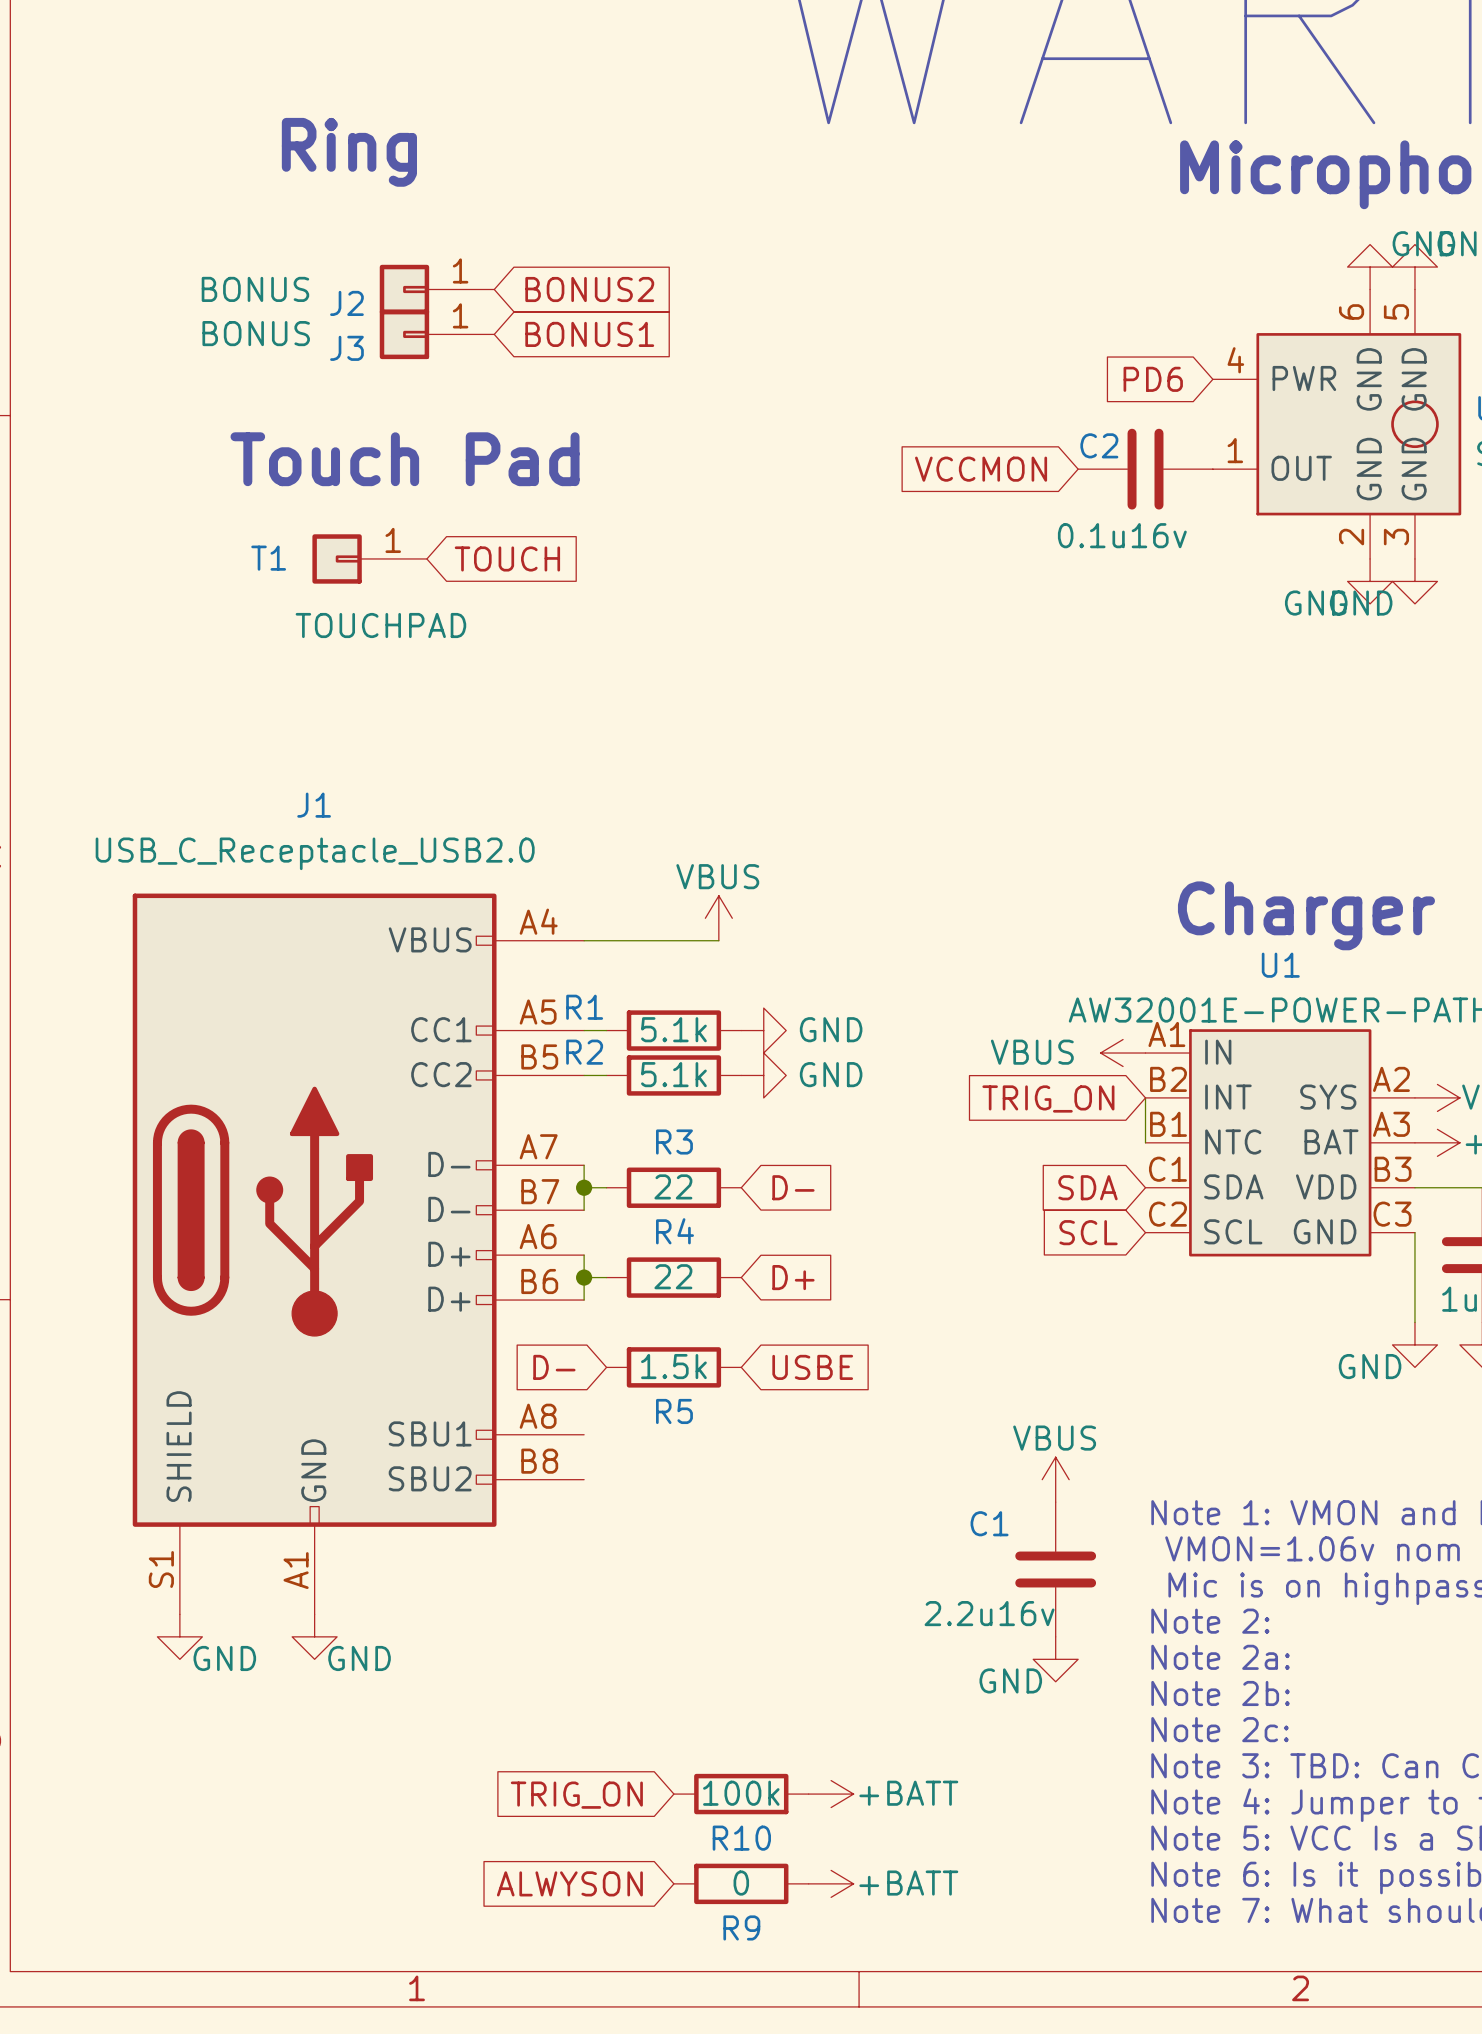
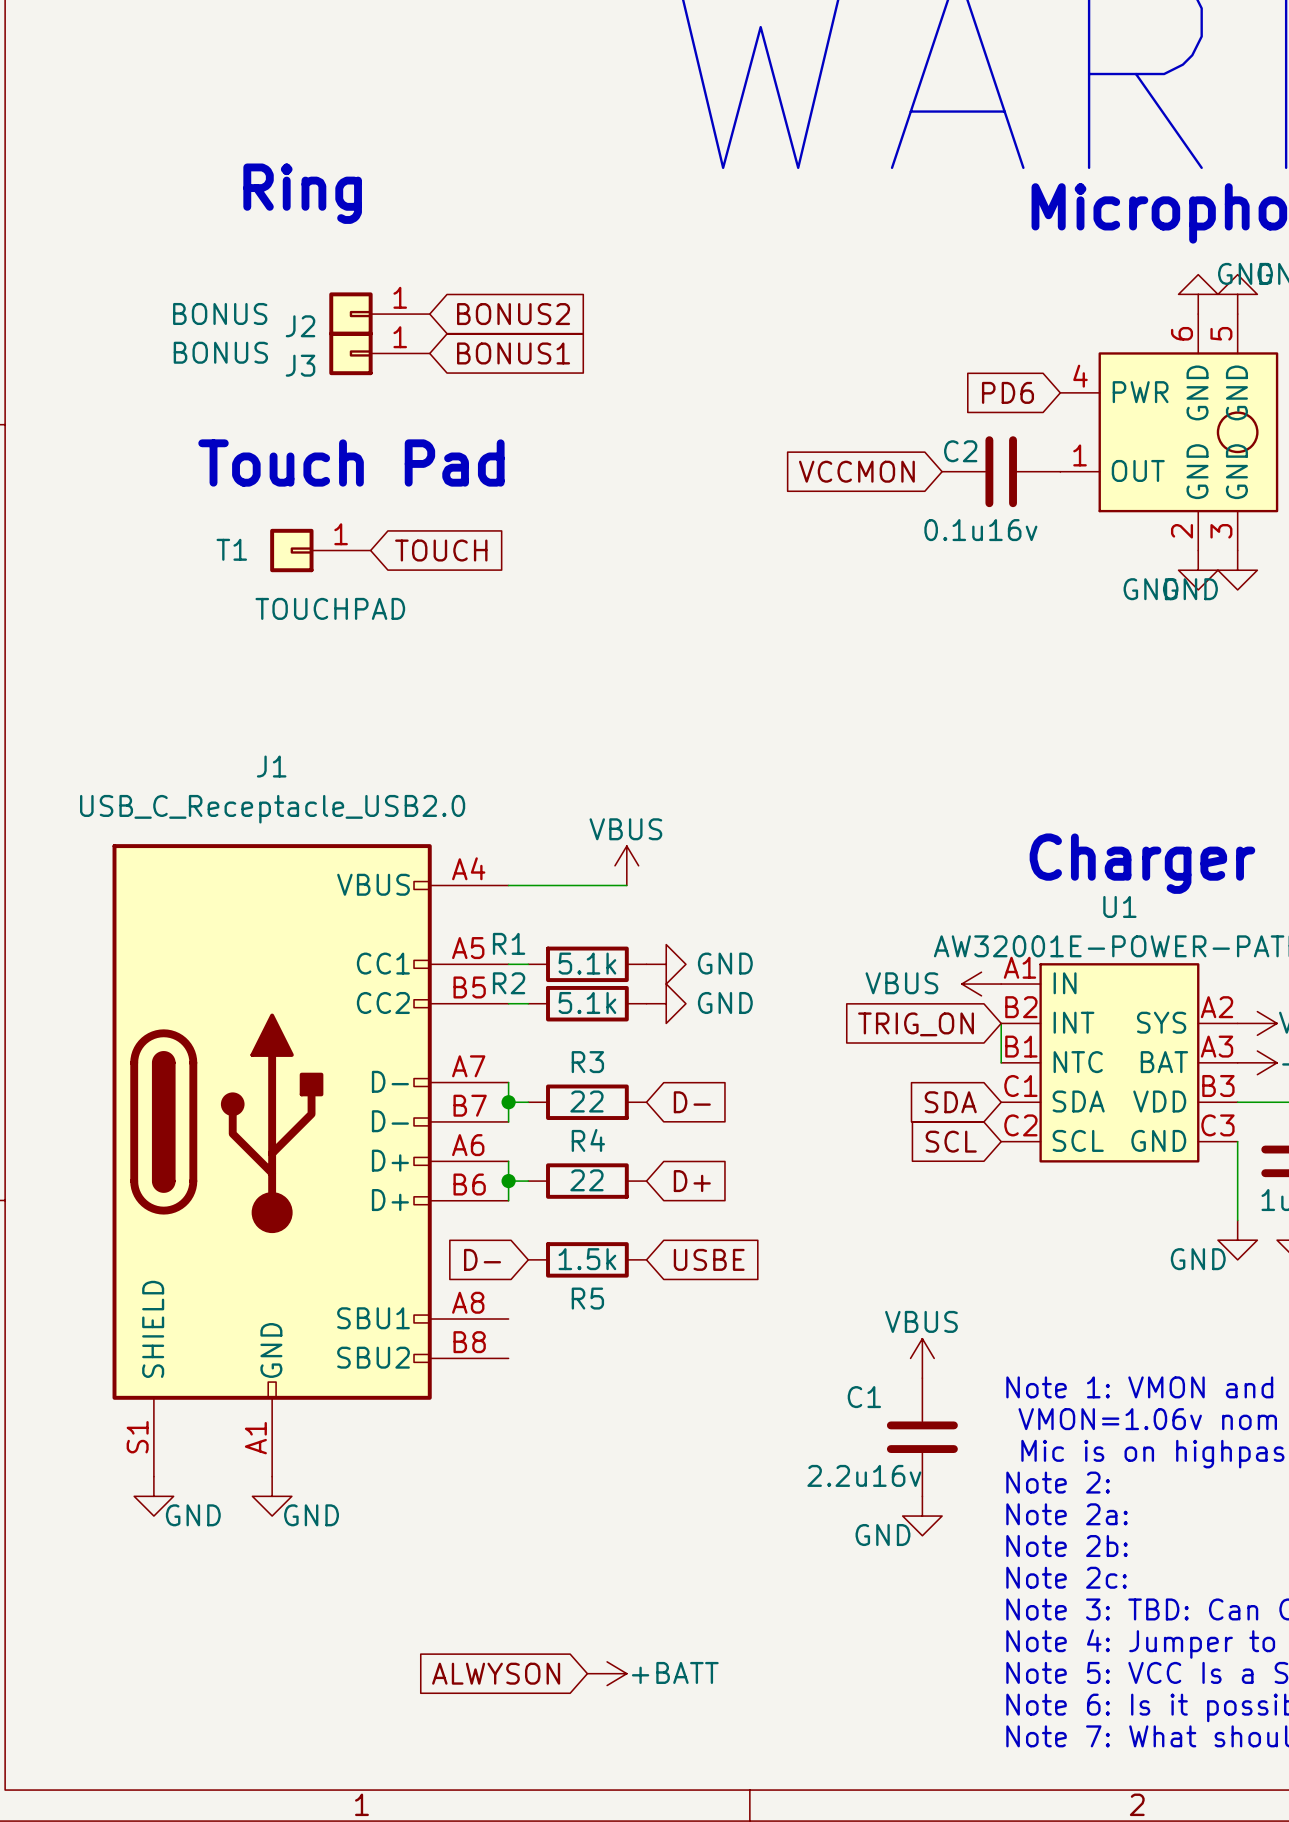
R10: 100k (741, 1794) -> none
power symbol: +BATT (831, 1794) -> none
global label: TRIG_ON (576, 1795) -> none
power symbol: none -> +BATT (607, 1673)
global label position: ALWYSON (569, 1883) -> ALWYSON (496, 1673)
R9: 0 (741, 1883) -> none
power symbol: +BATT (831, 1883) -> none

